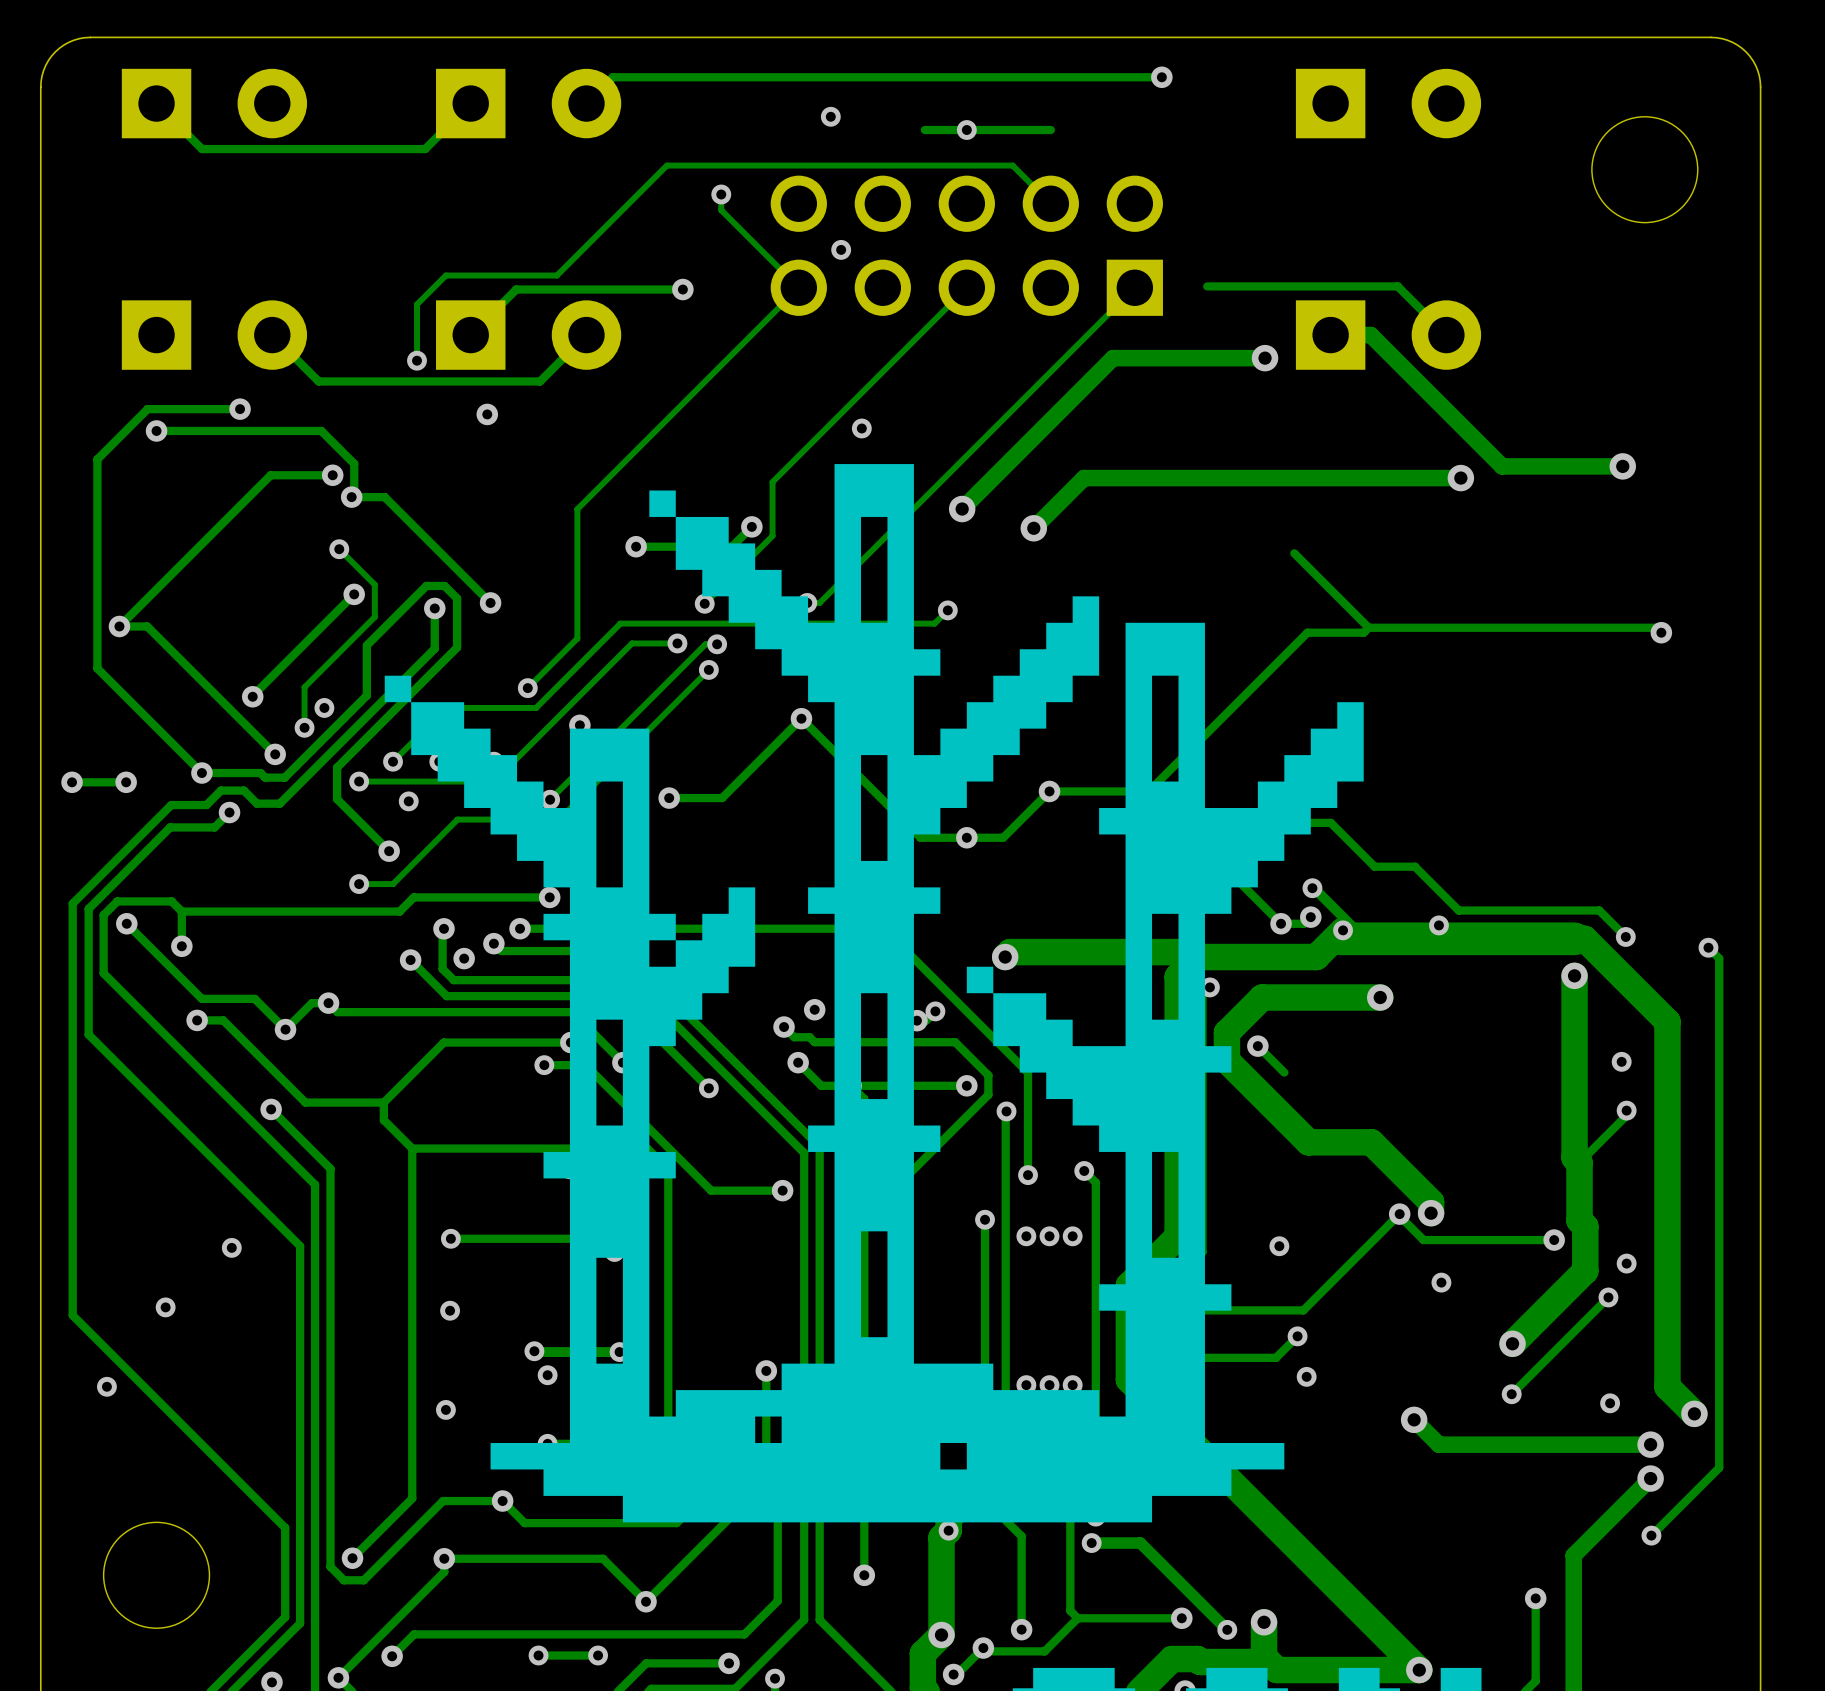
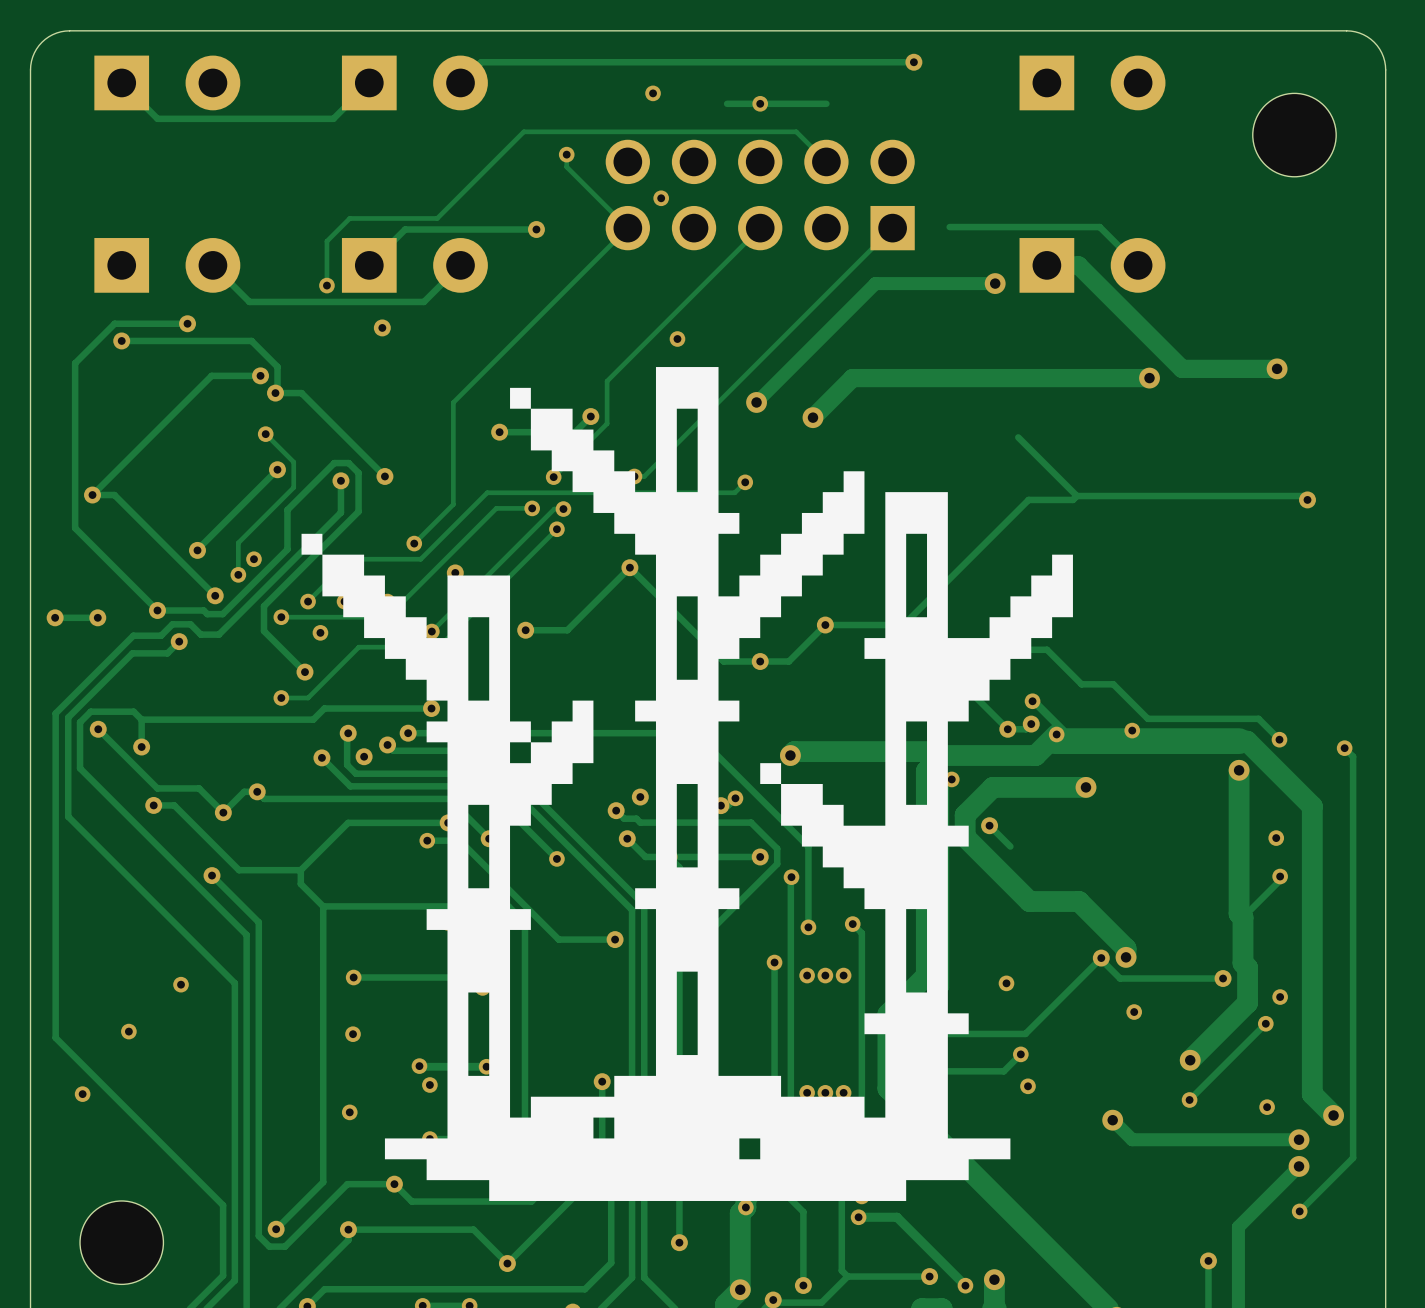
track width: thin (1330, 335) (1370, 335) (1502, 466) (1622, 466) -> thick (1046, 265) (1078, 265) (1182, 368) (1277, 368)
track width: thin (1460, 478) (1084, 478) (1033, 528) -> thick (1149, 378) (852, 378) (812, 417)

